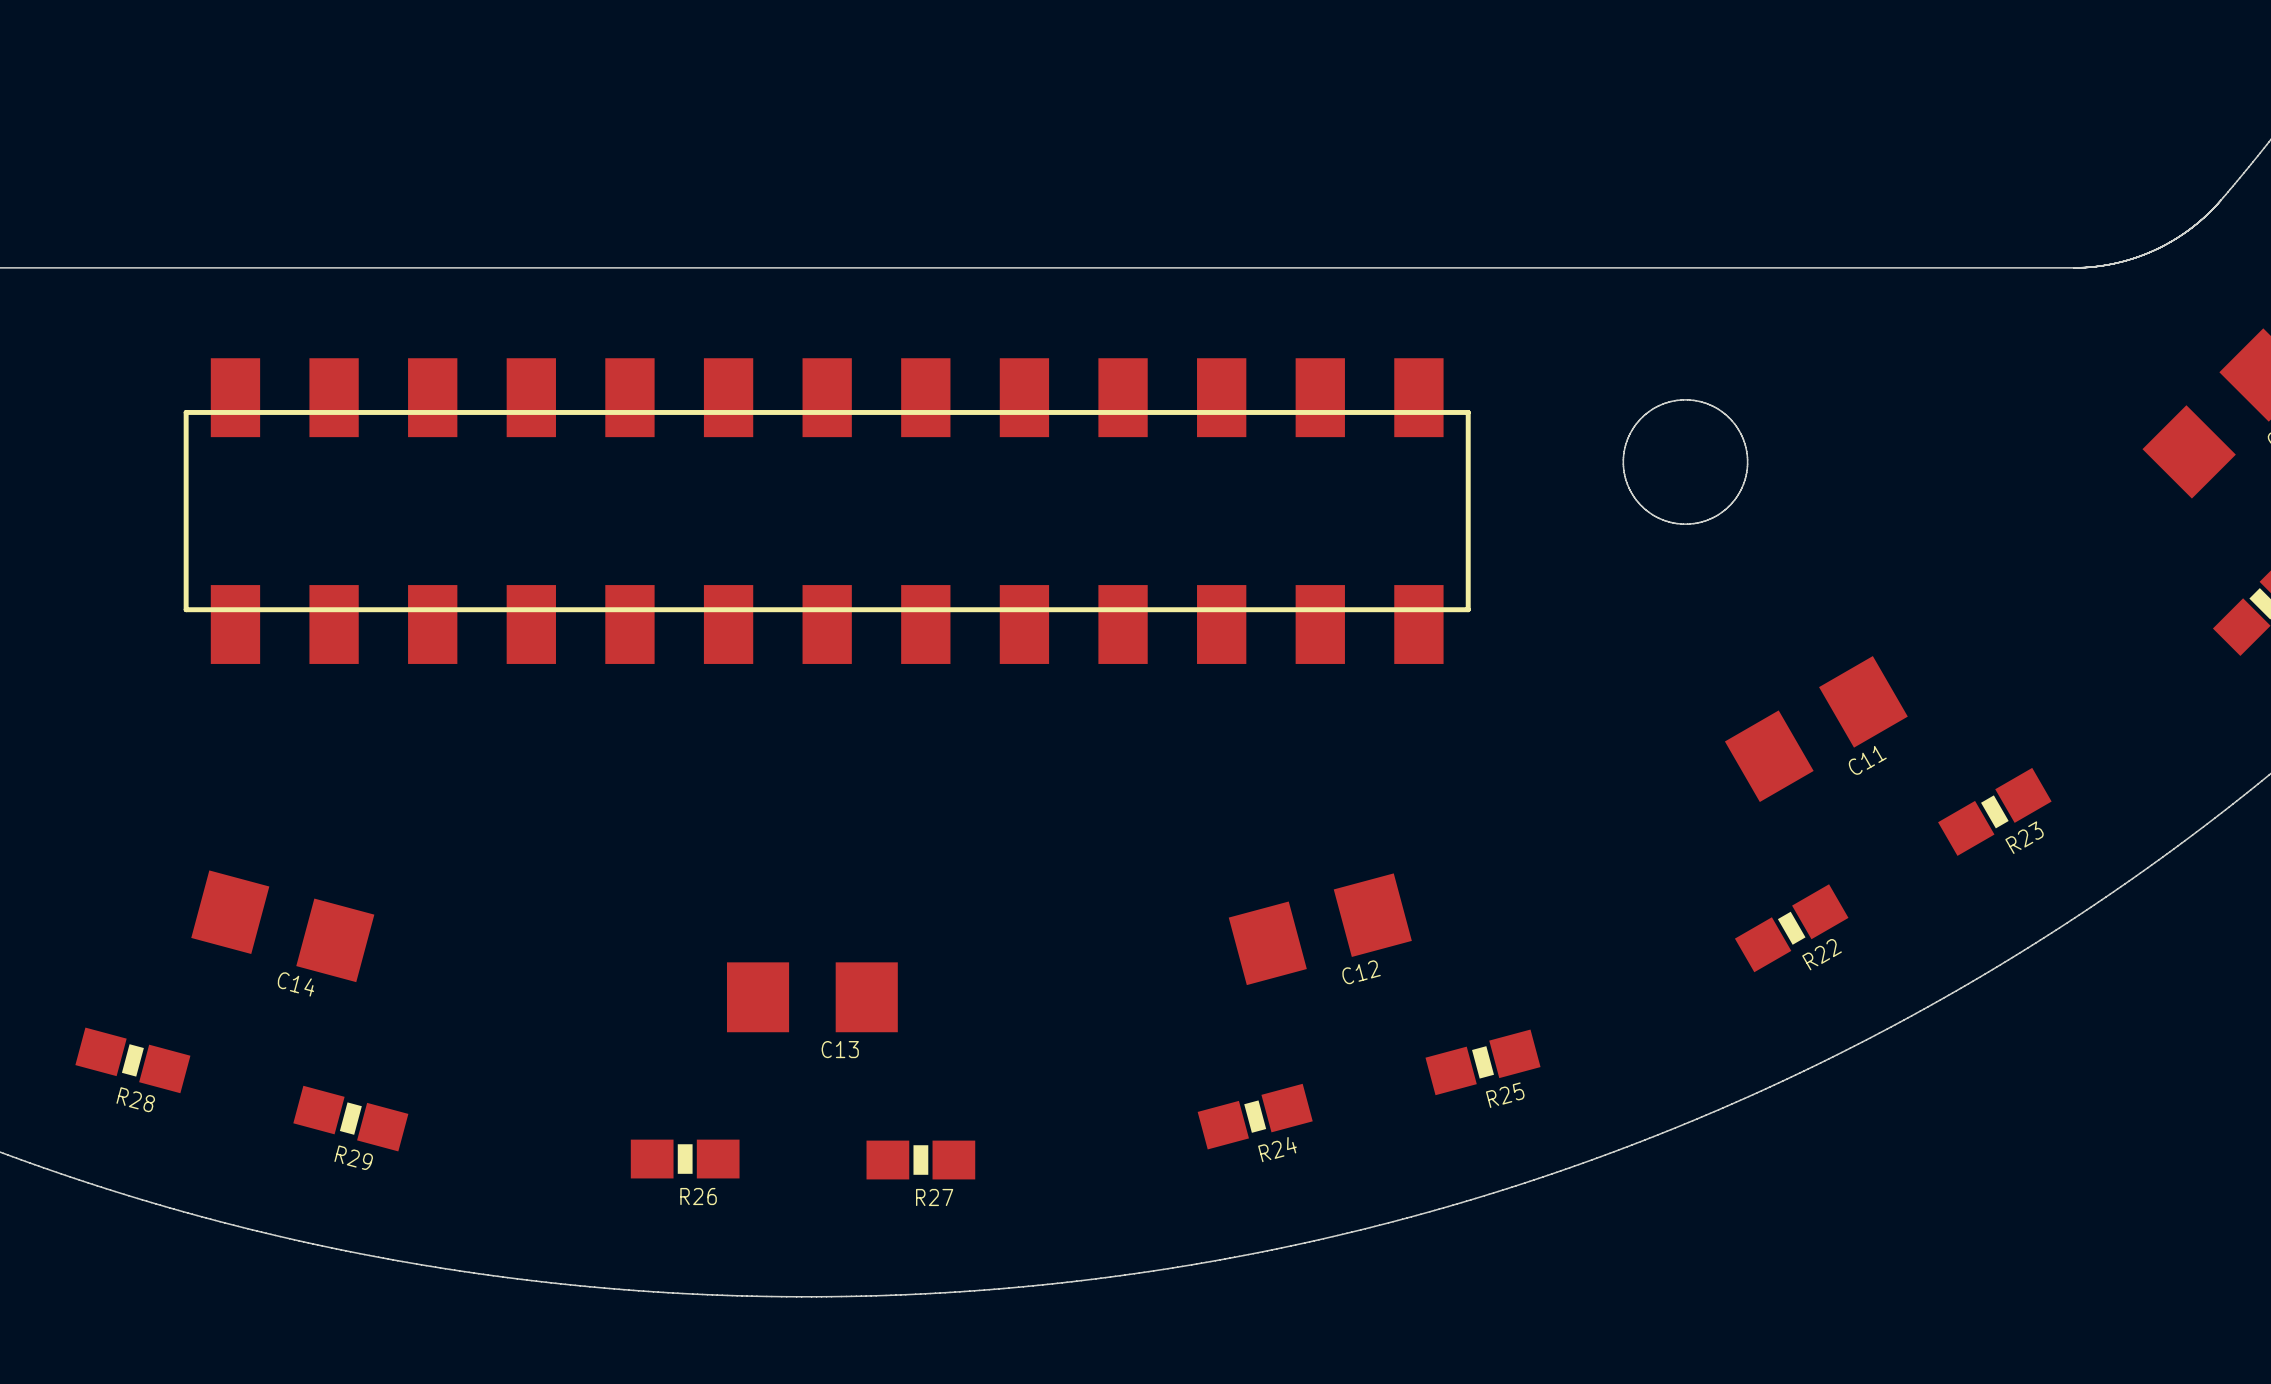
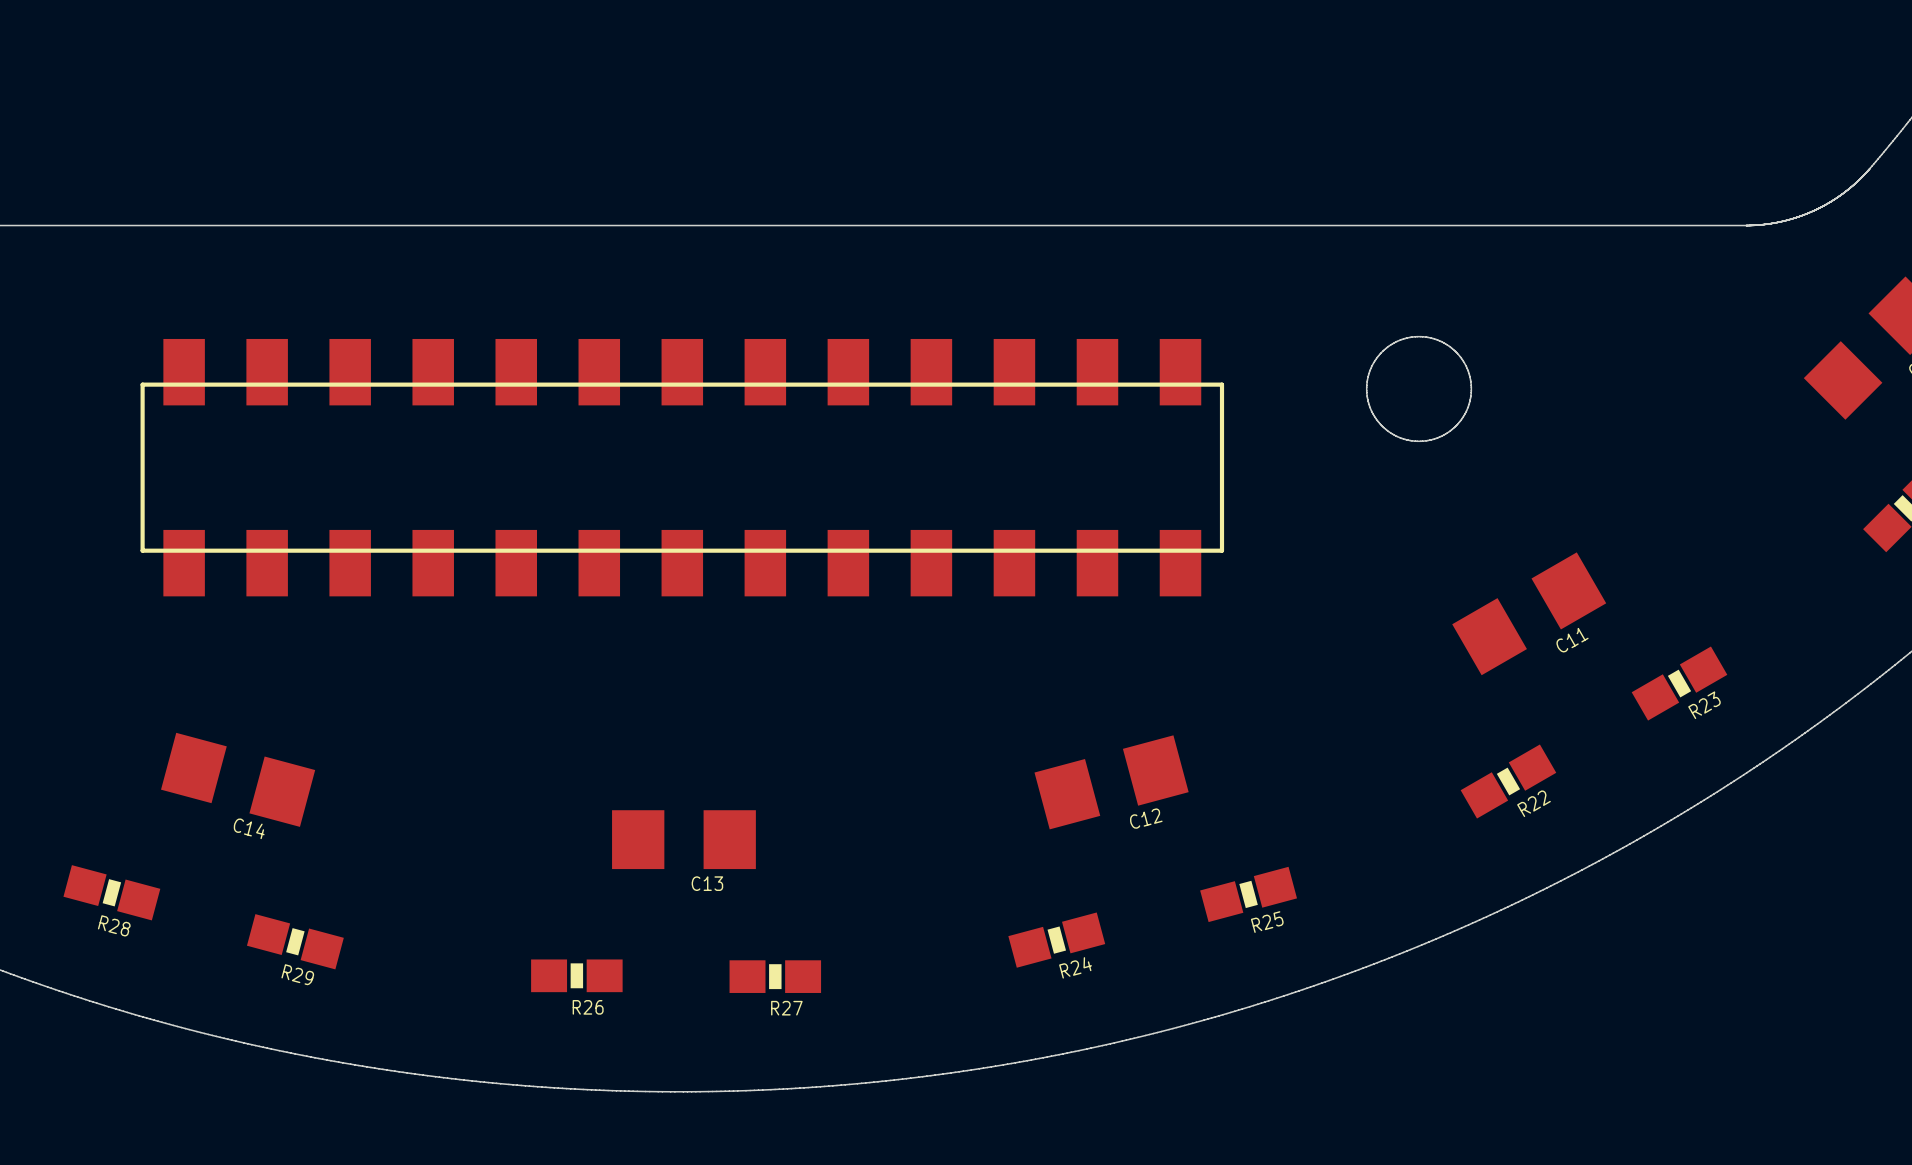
part position: (827, 511) -> (682, 467)

